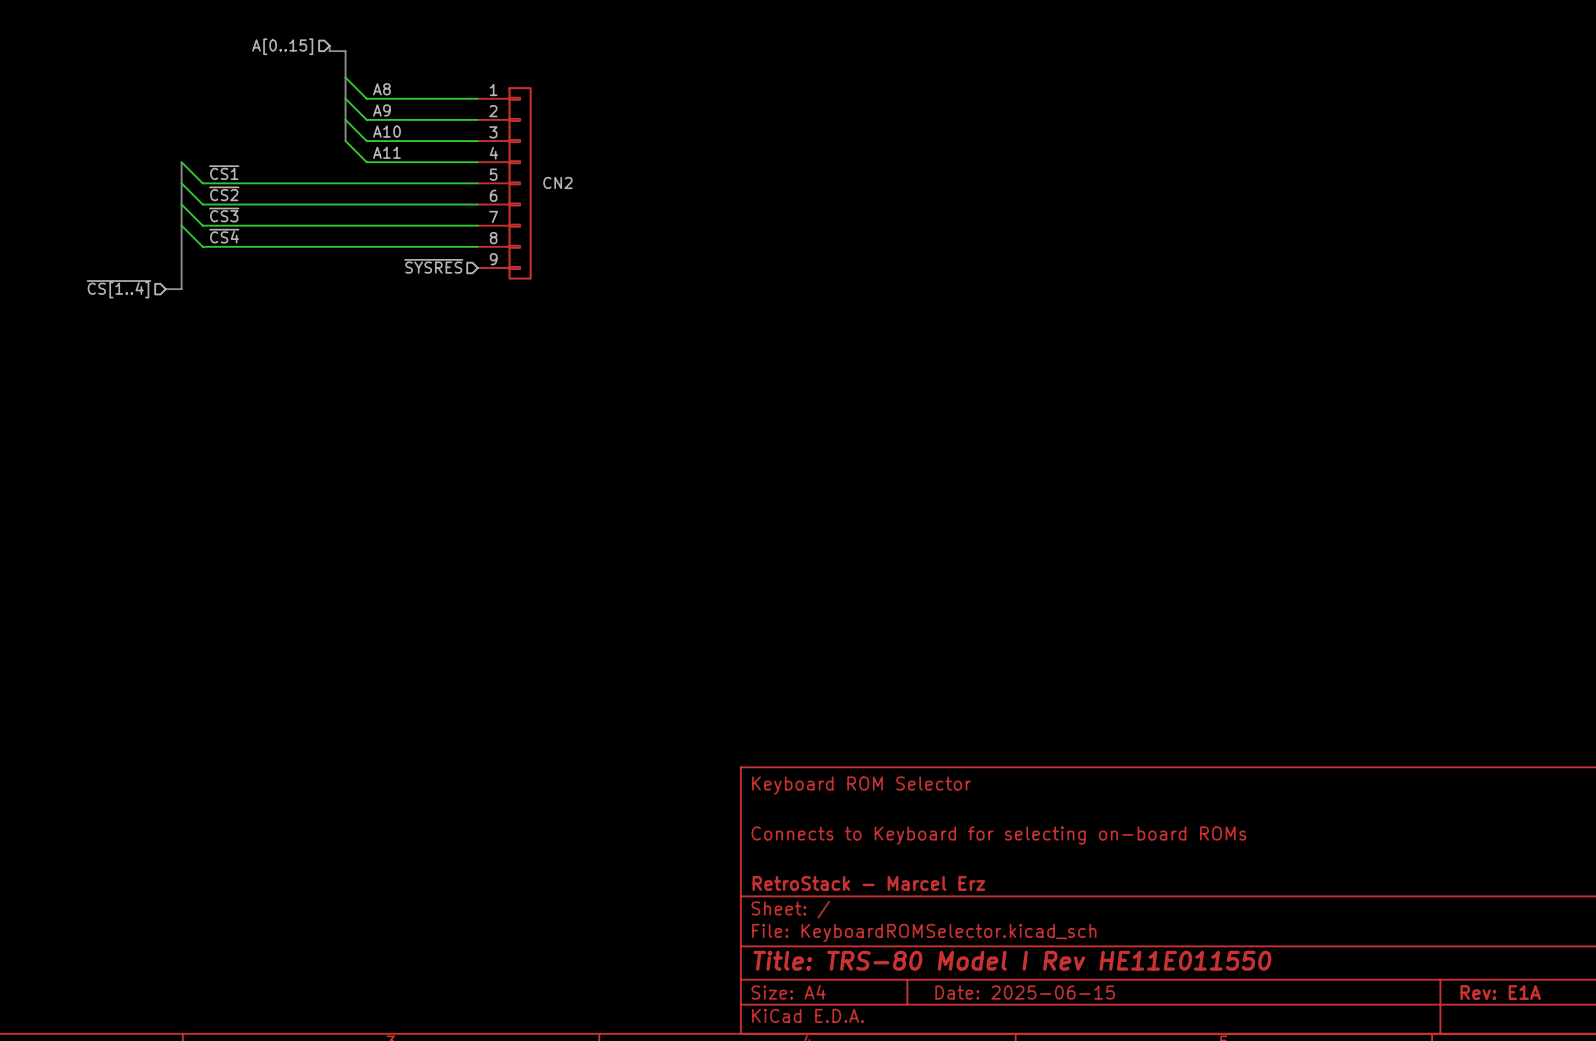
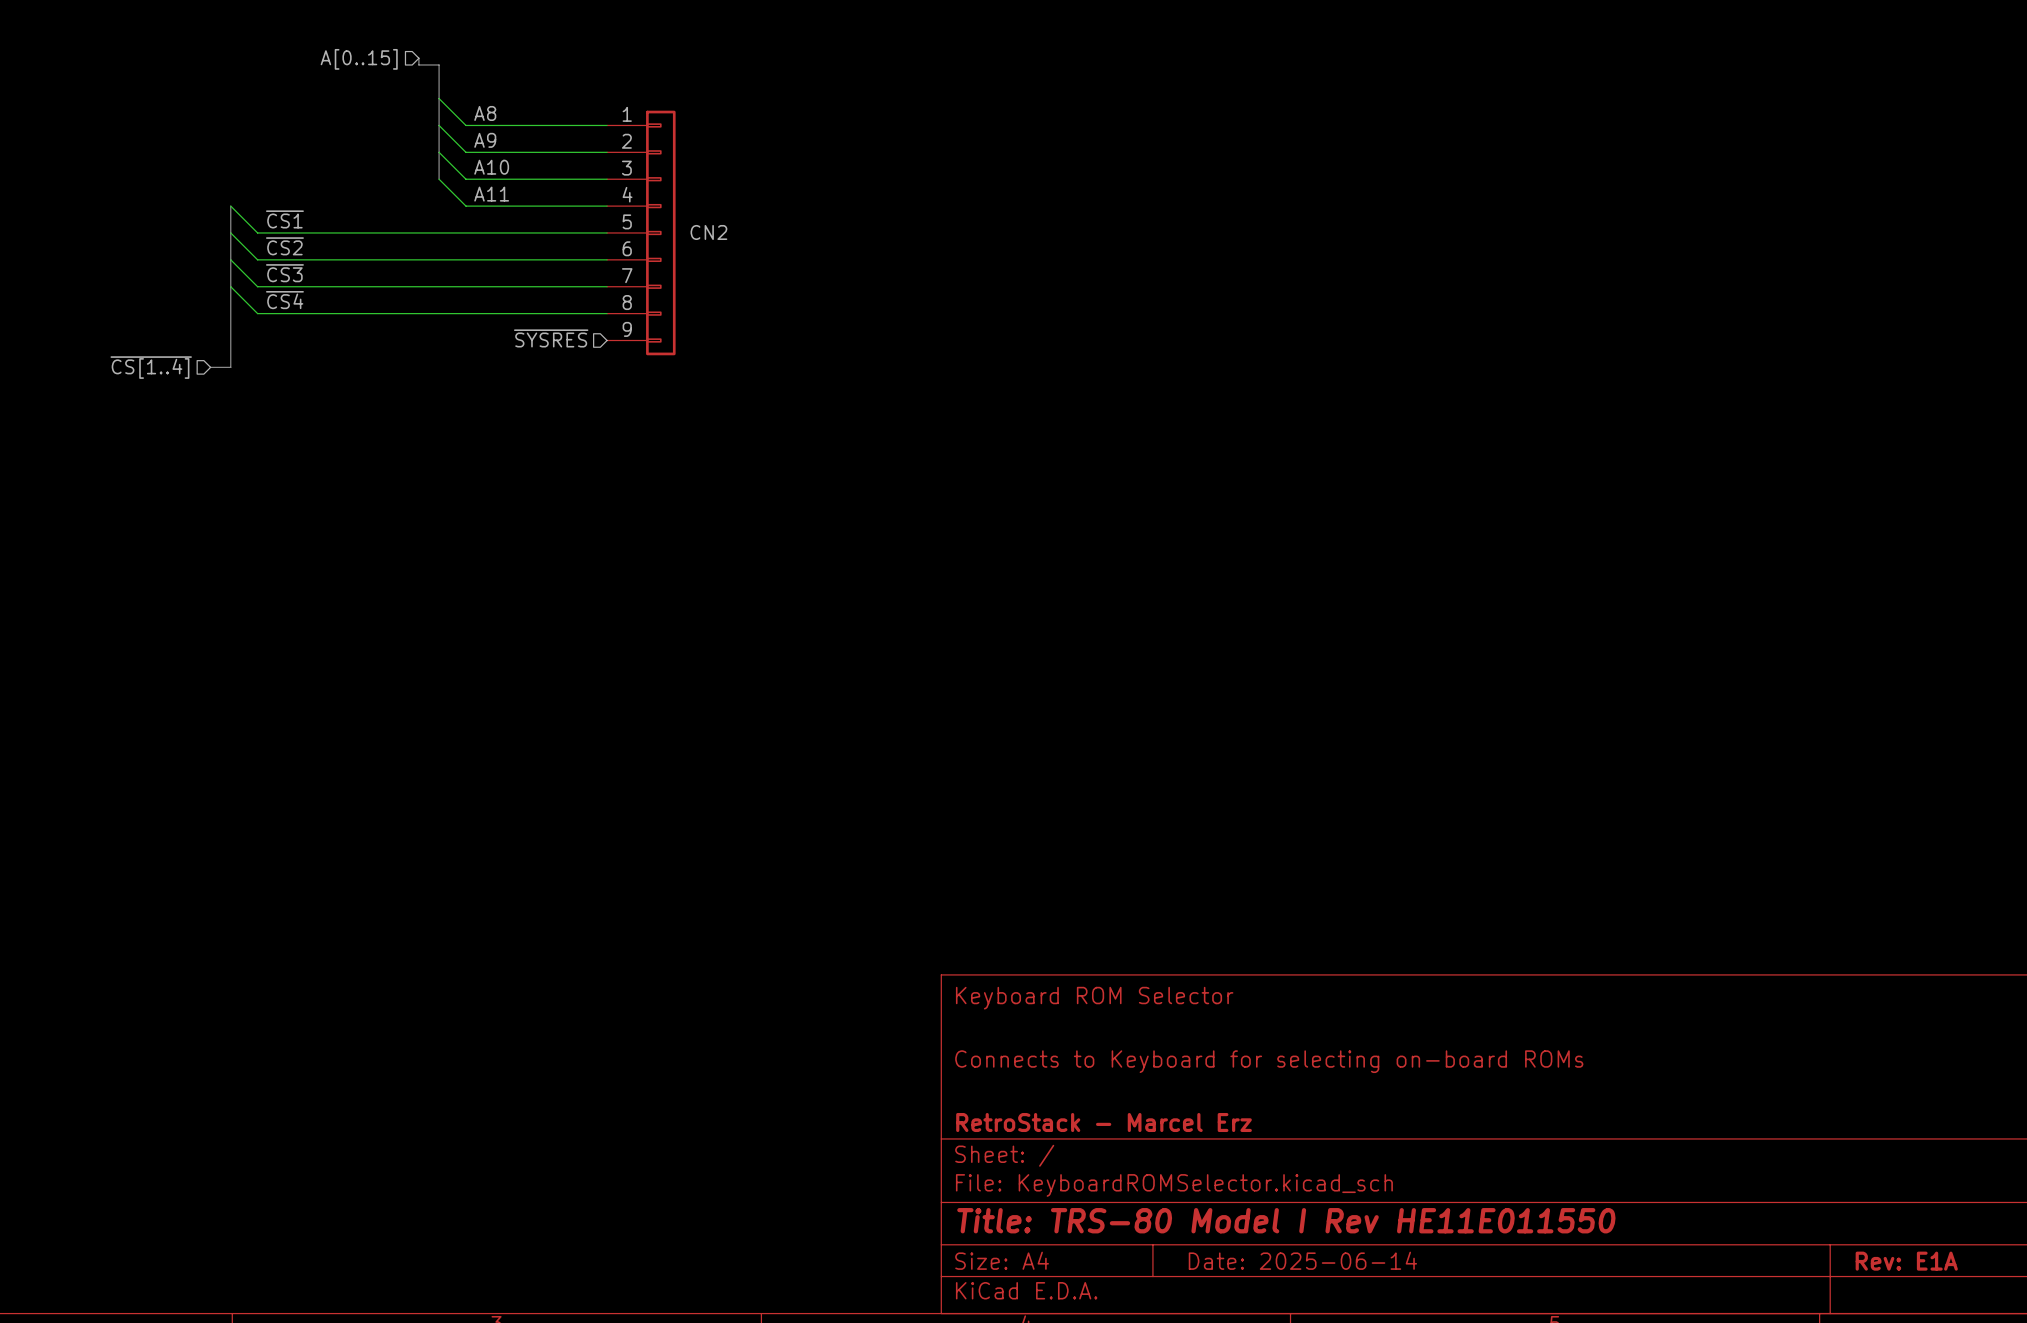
title block: Date: 2025-06-15 (1025, 992) -> Date: 2025-06-14 (1302, 1260)

